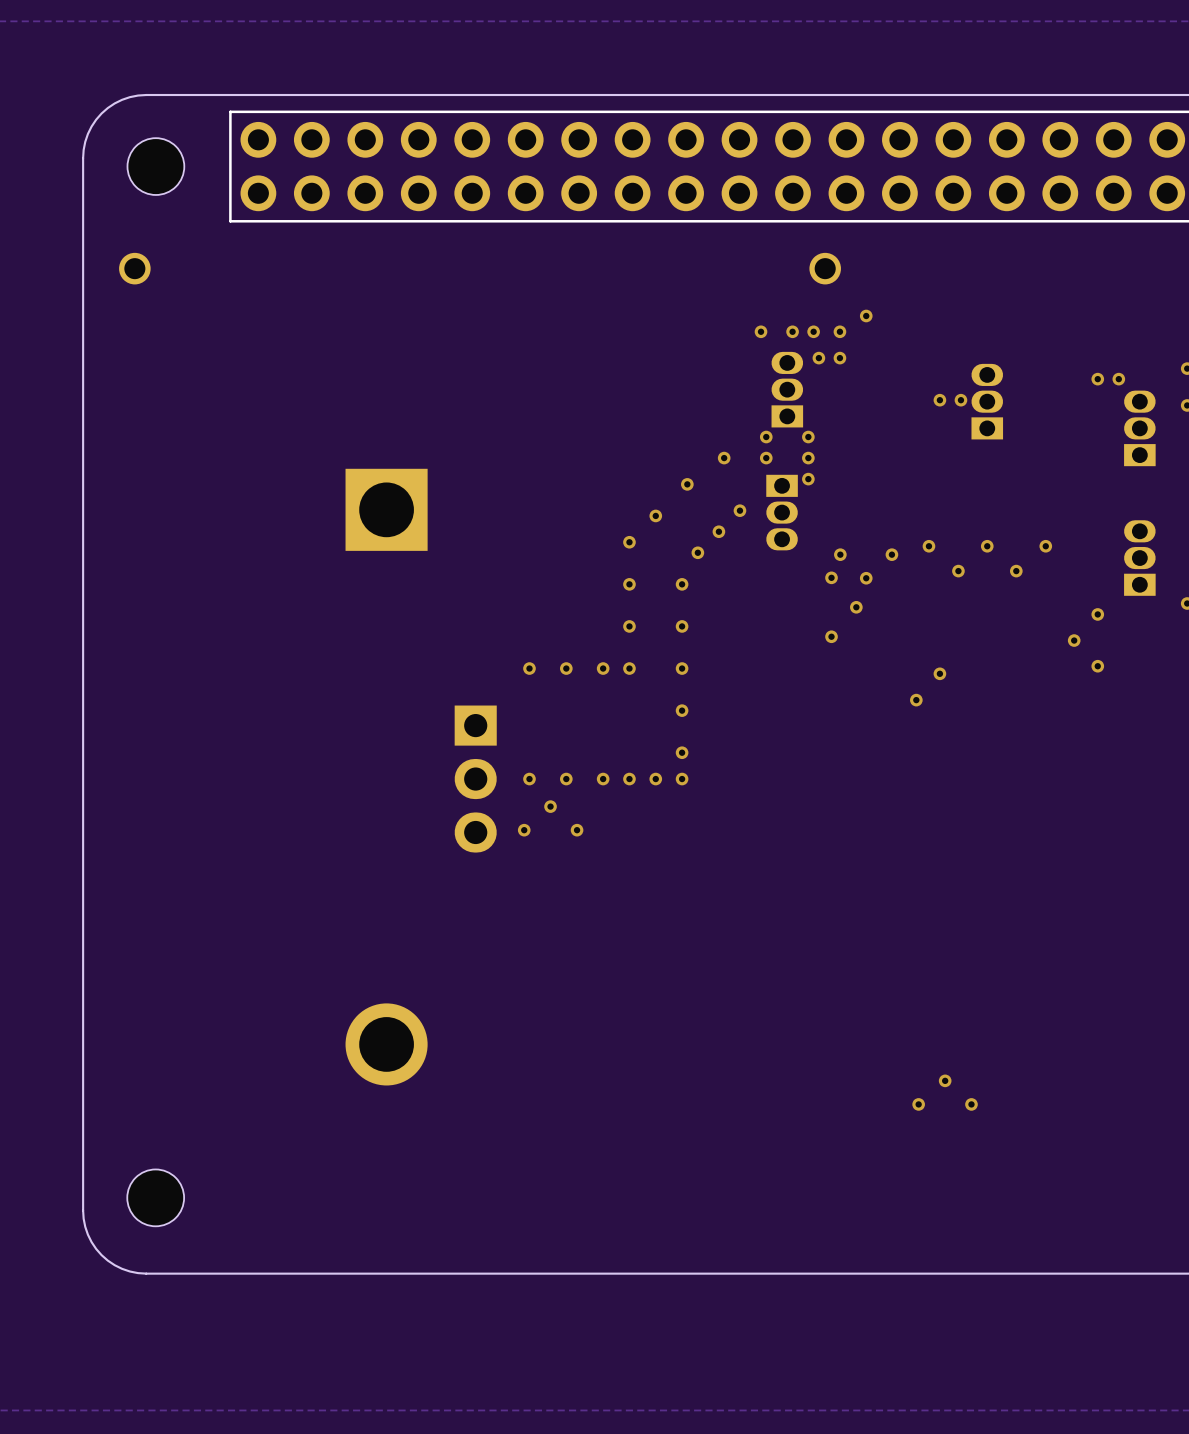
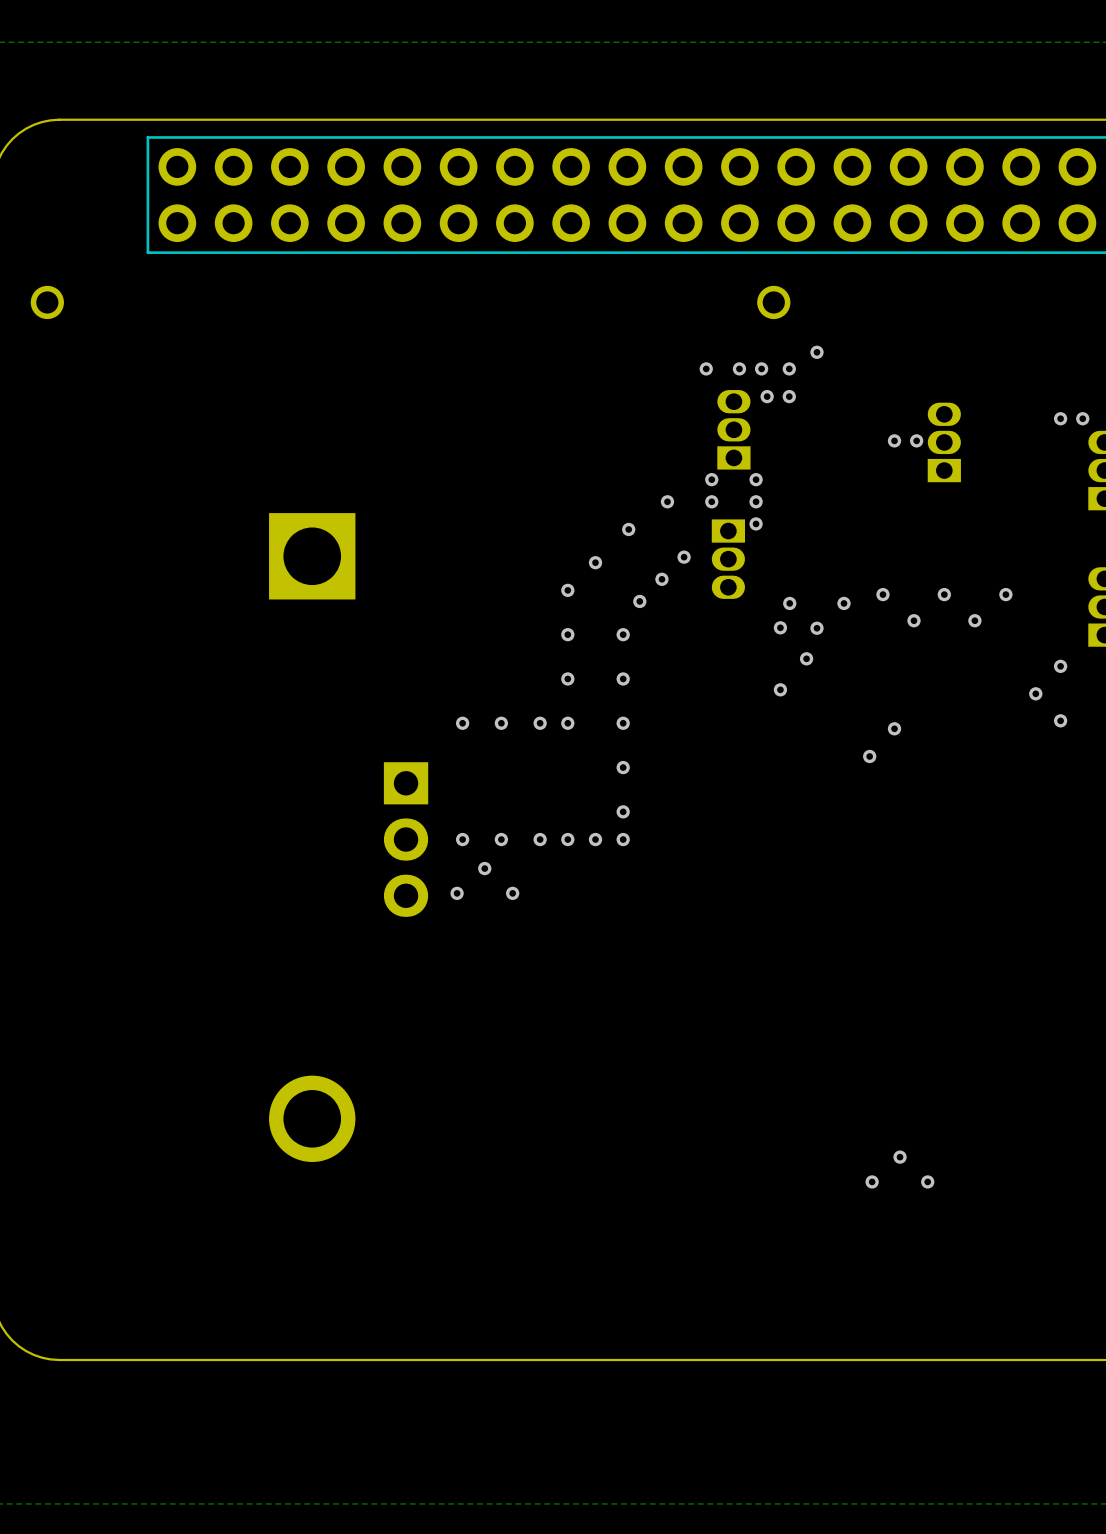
part: (155, 166) -> none
part: (155, 1197) -> none

